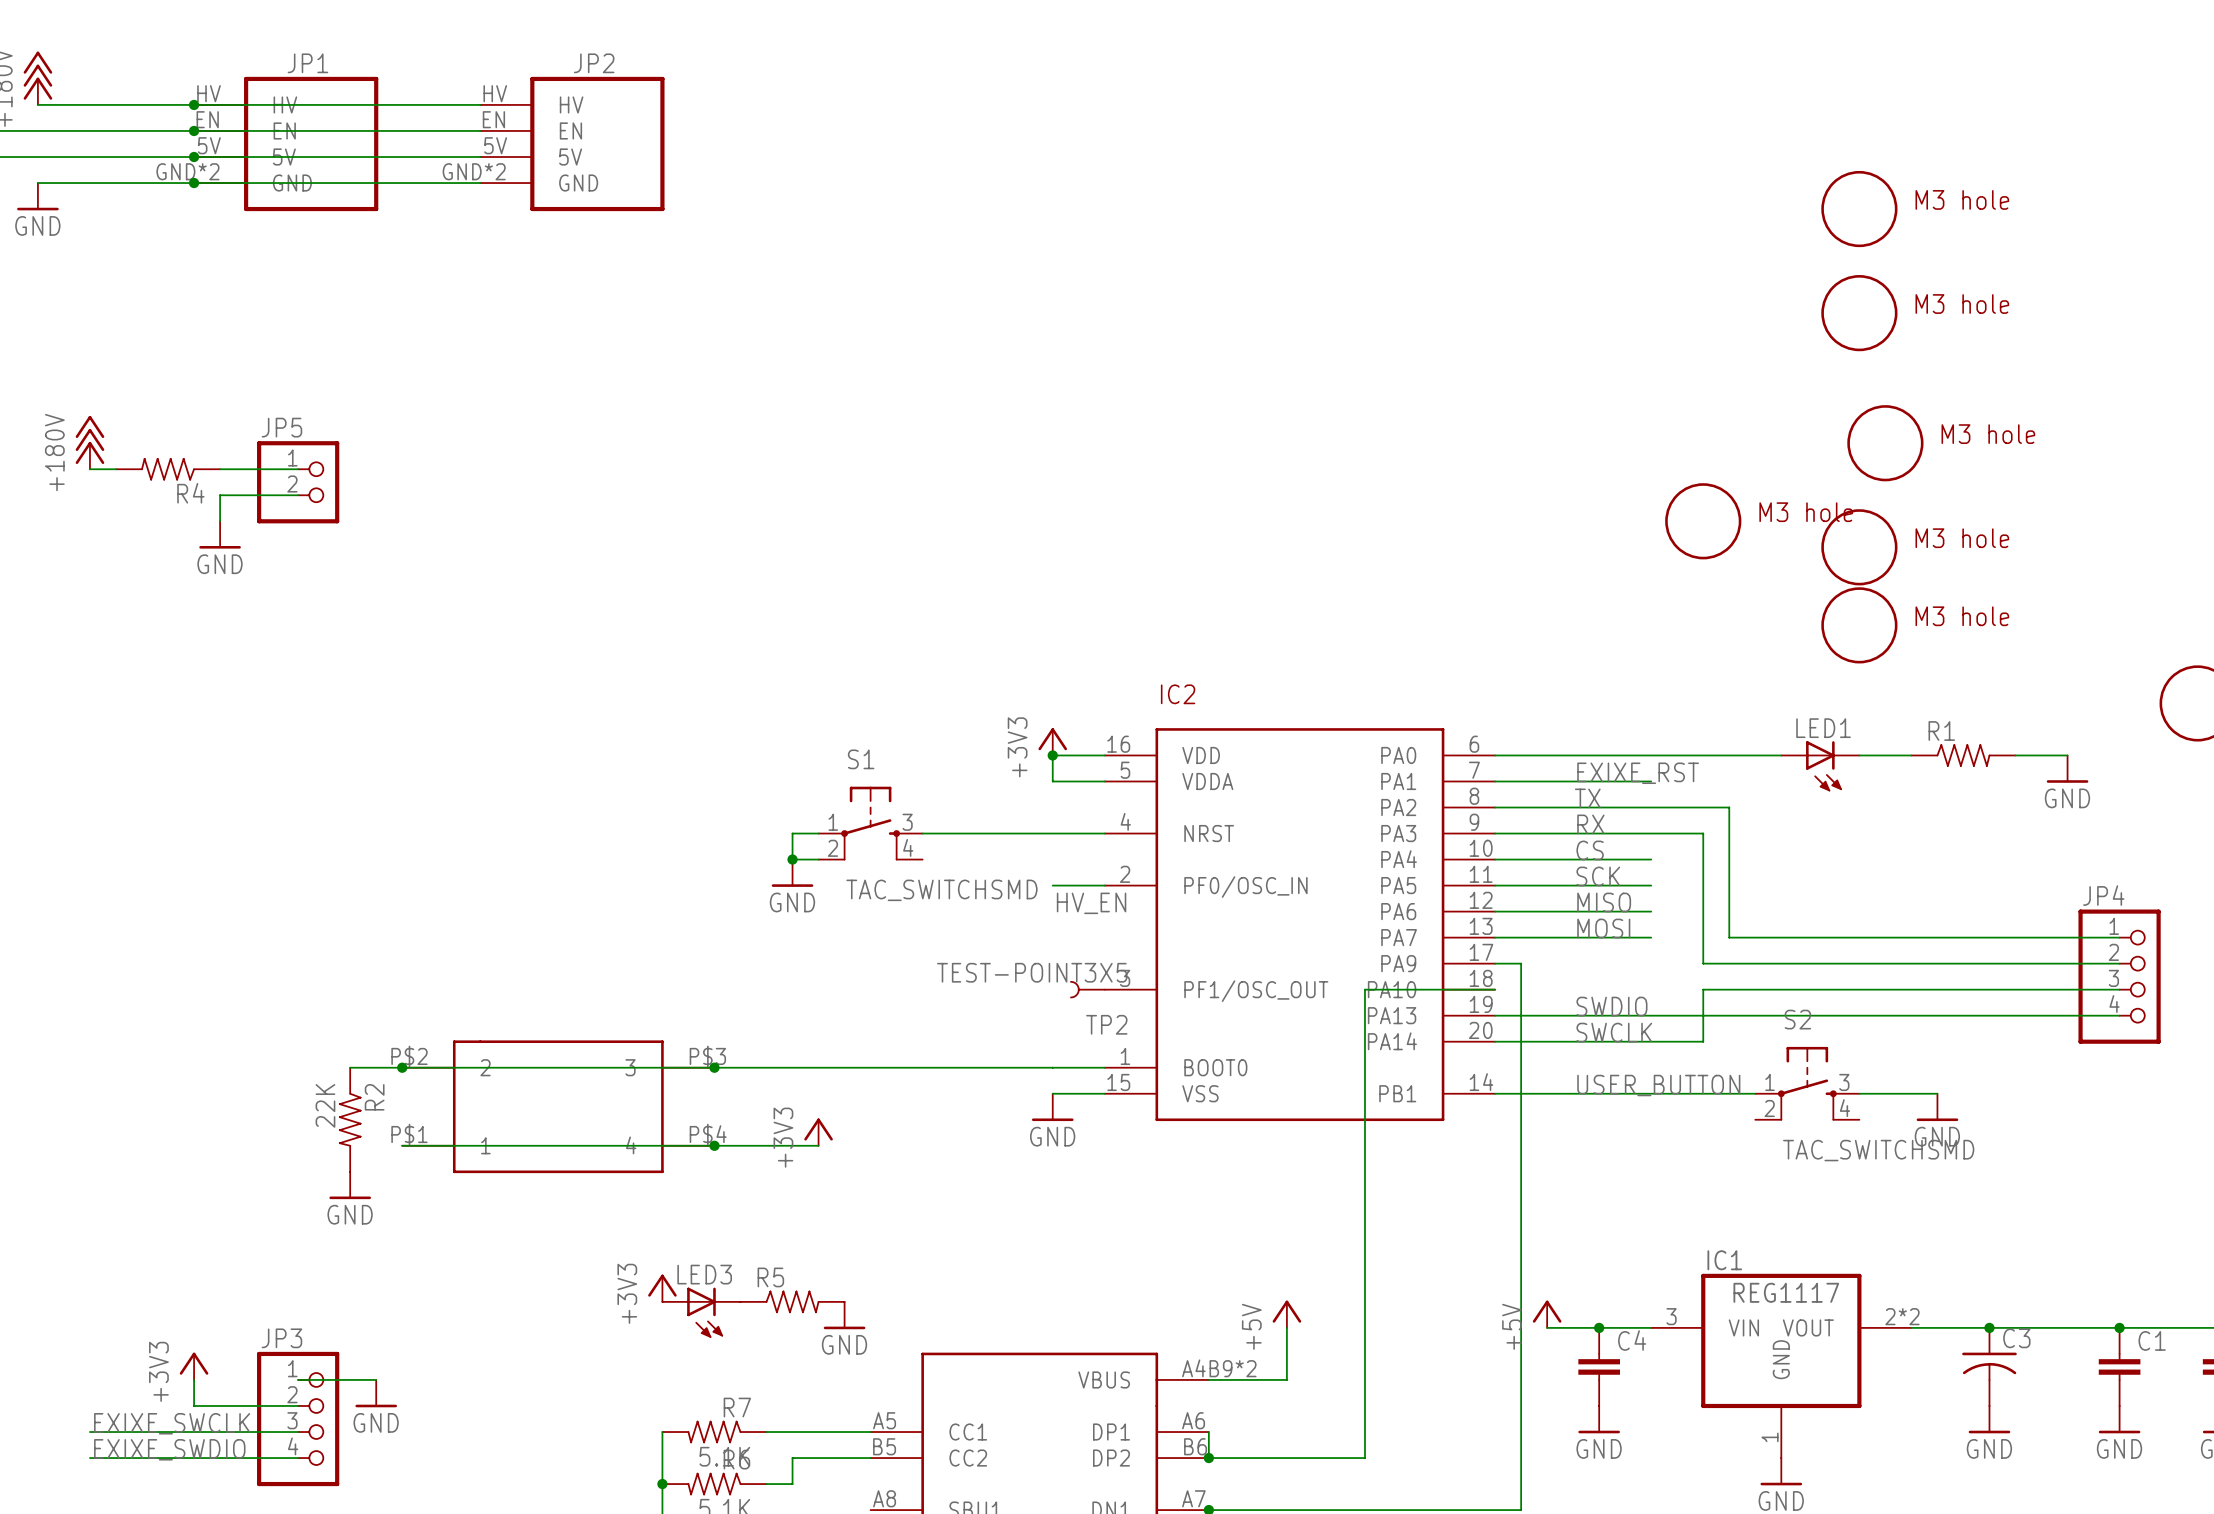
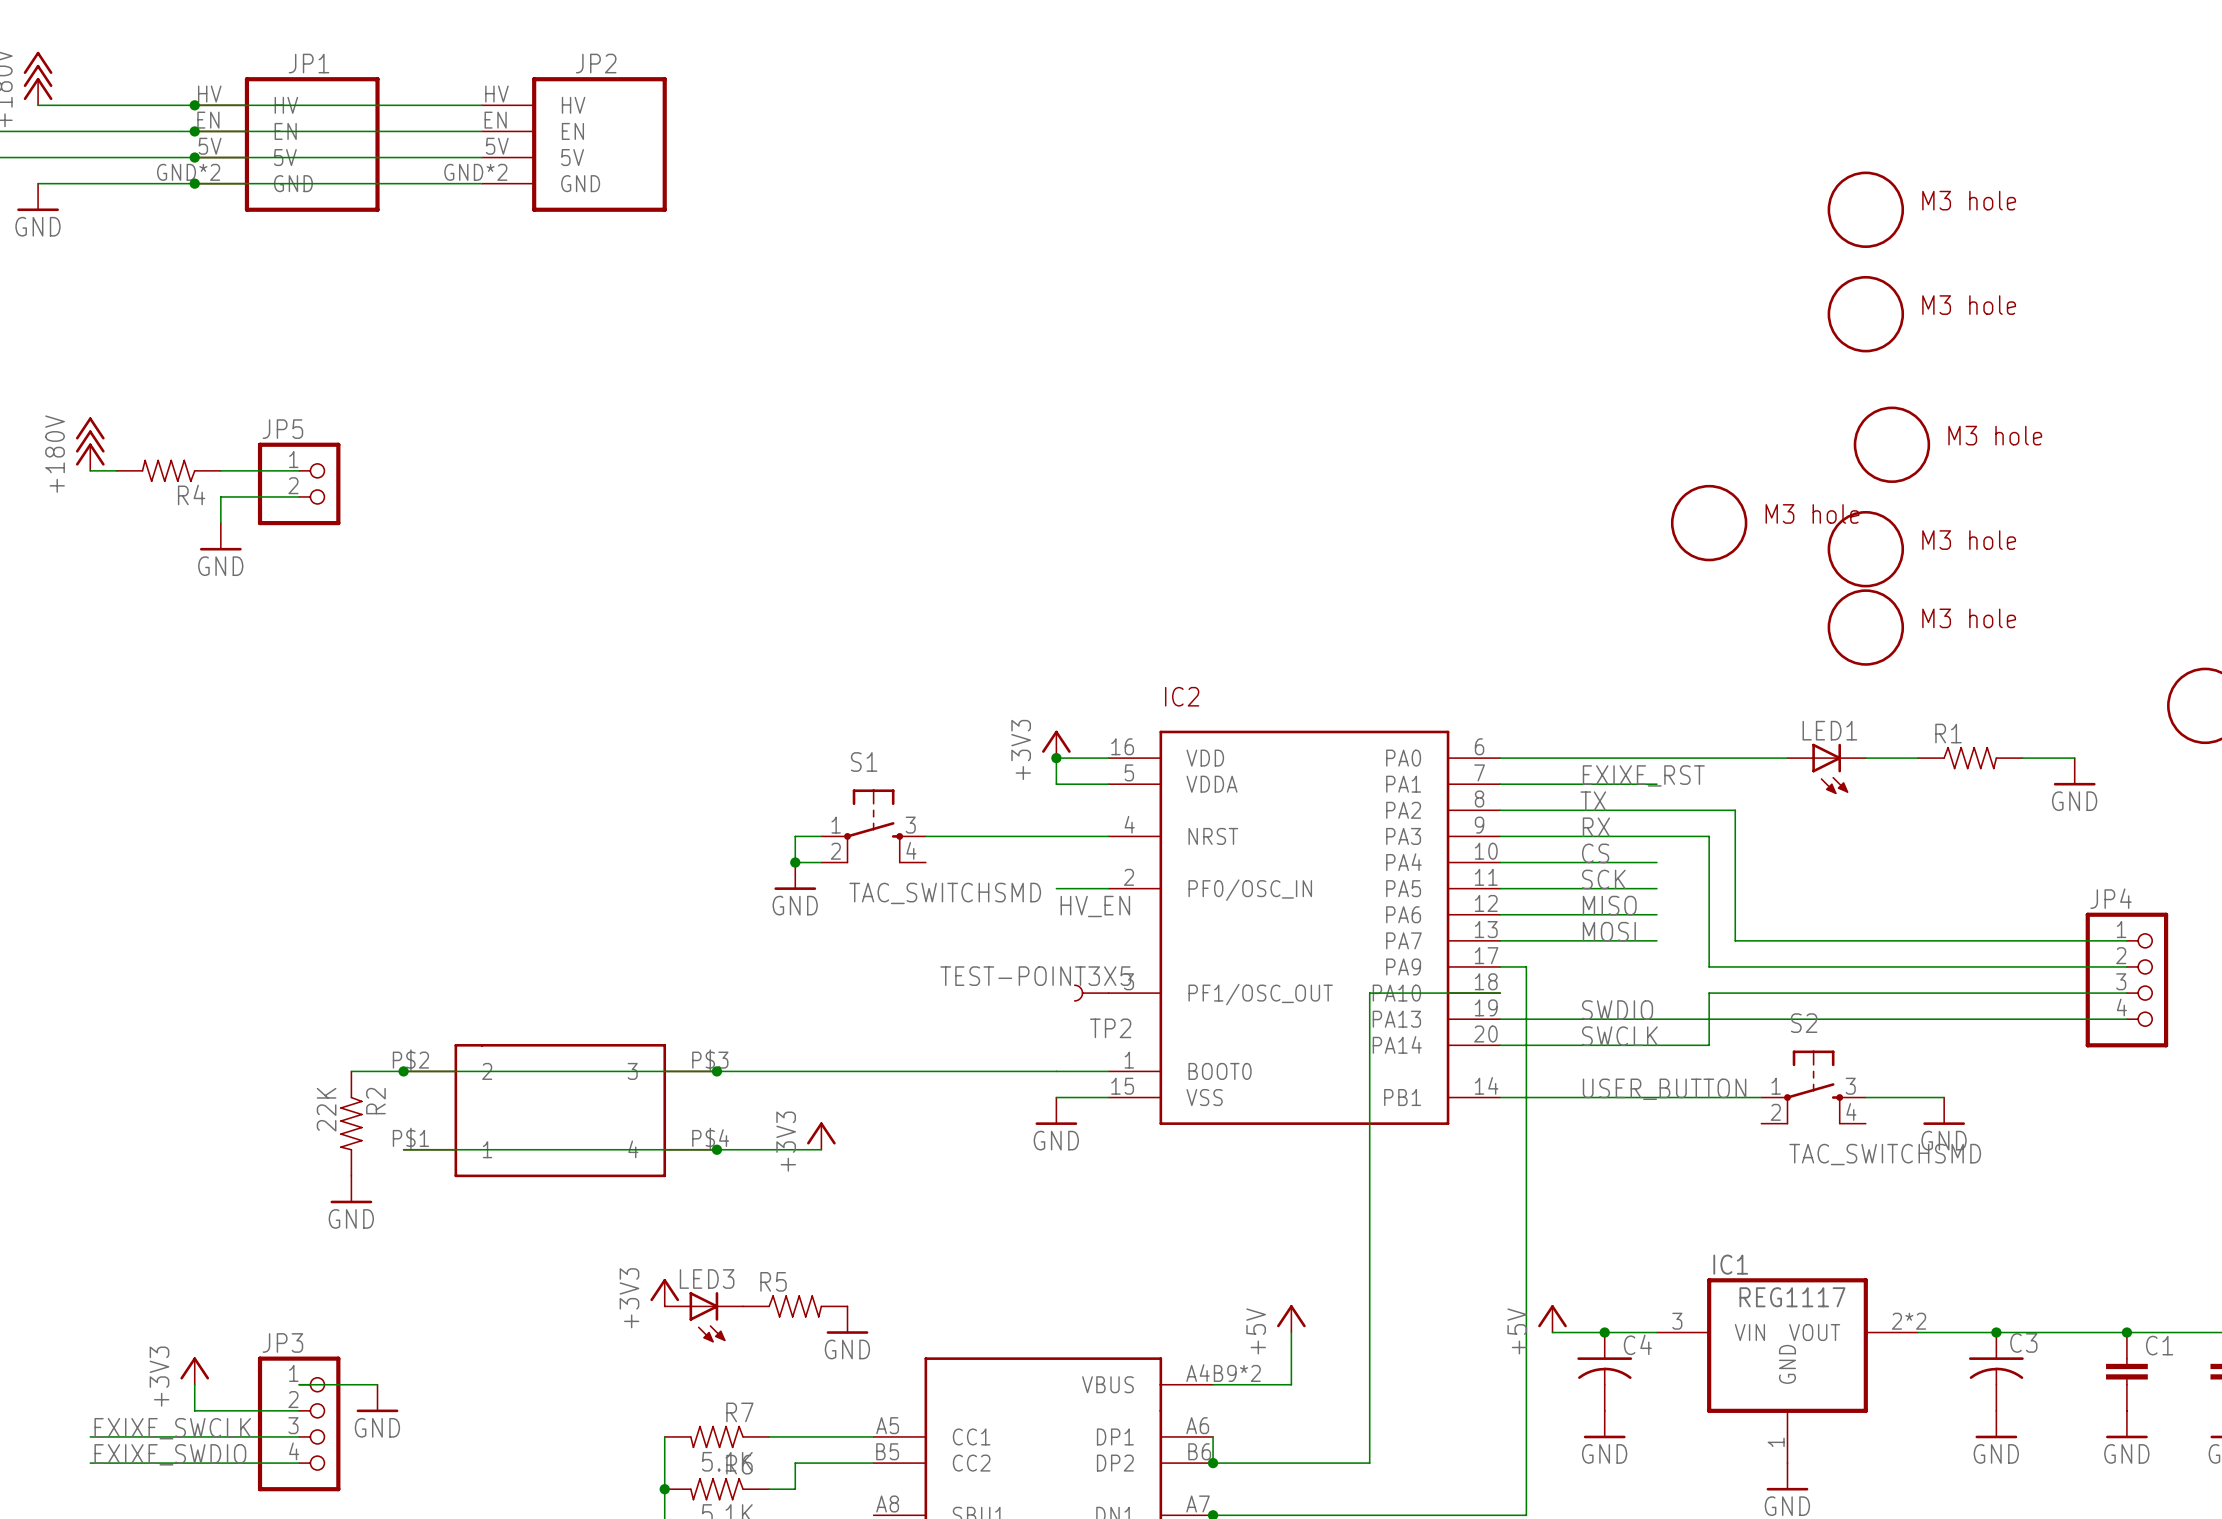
C4 symbol: [1578, 1327, 1620, 1406] -> [1577, 1332, 1633, 1411]

